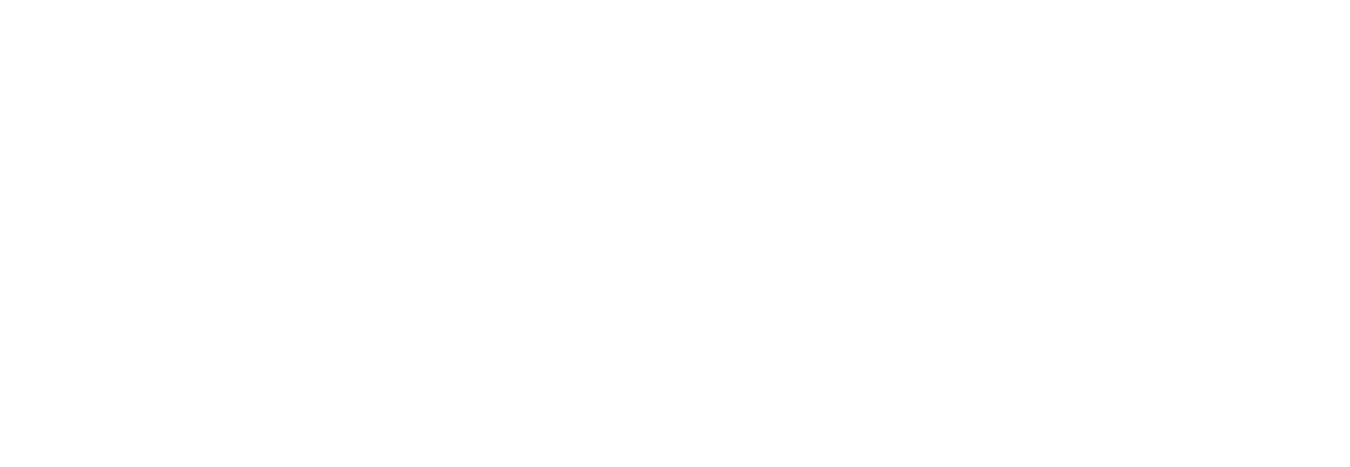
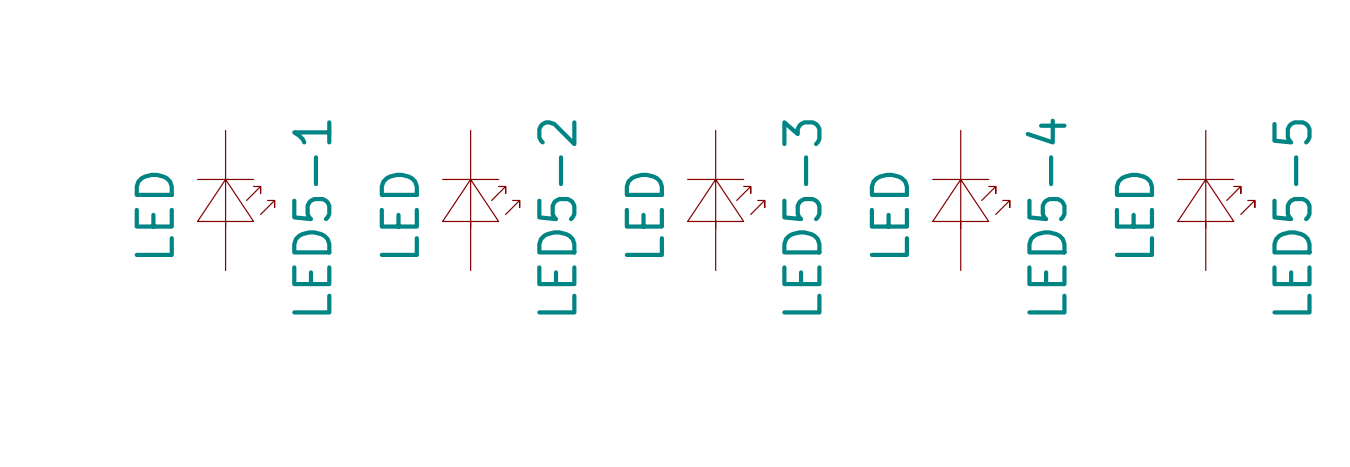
LED5-1: none -> LED (236, 200)
LED5-2: none -> LED (481, 200)
LED5-3: none -> LED (726, 200)
LED5-4: none -> LED (971, 200)
LED5-5: none -> LED (1216, 200)

